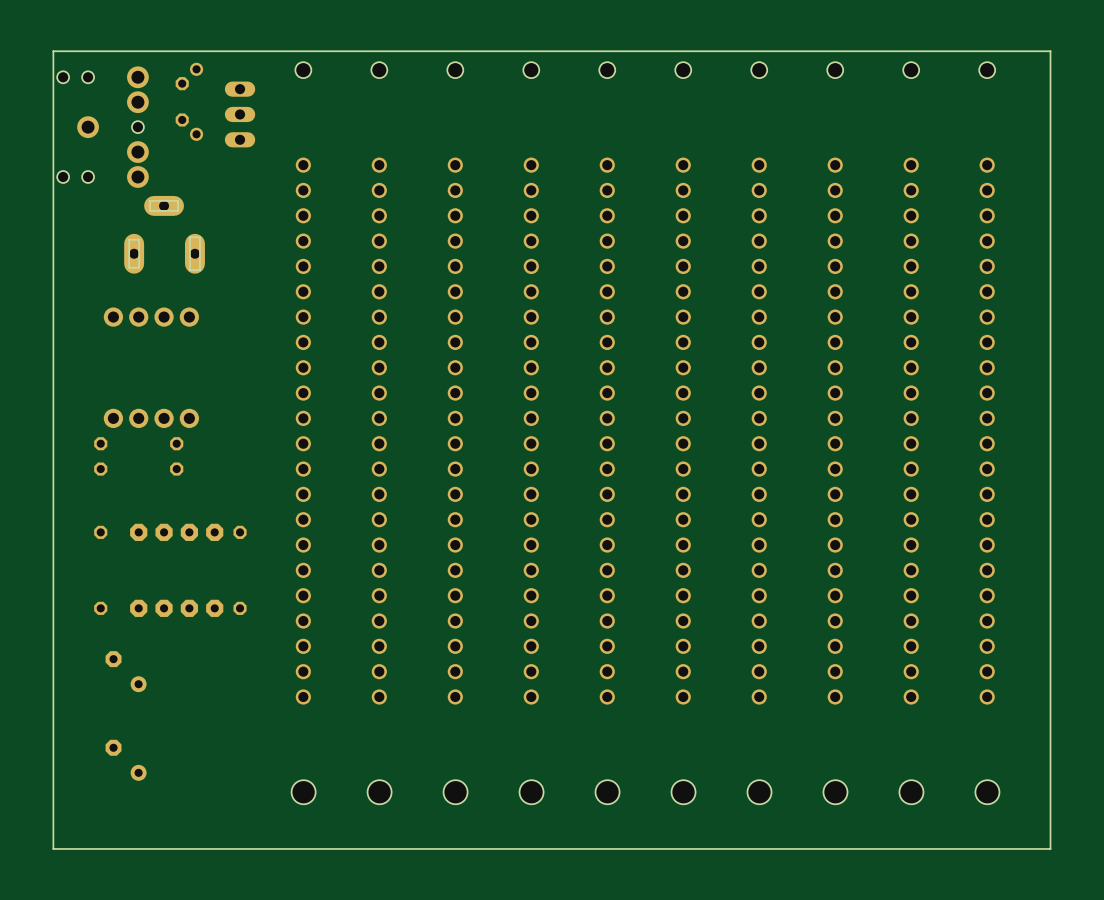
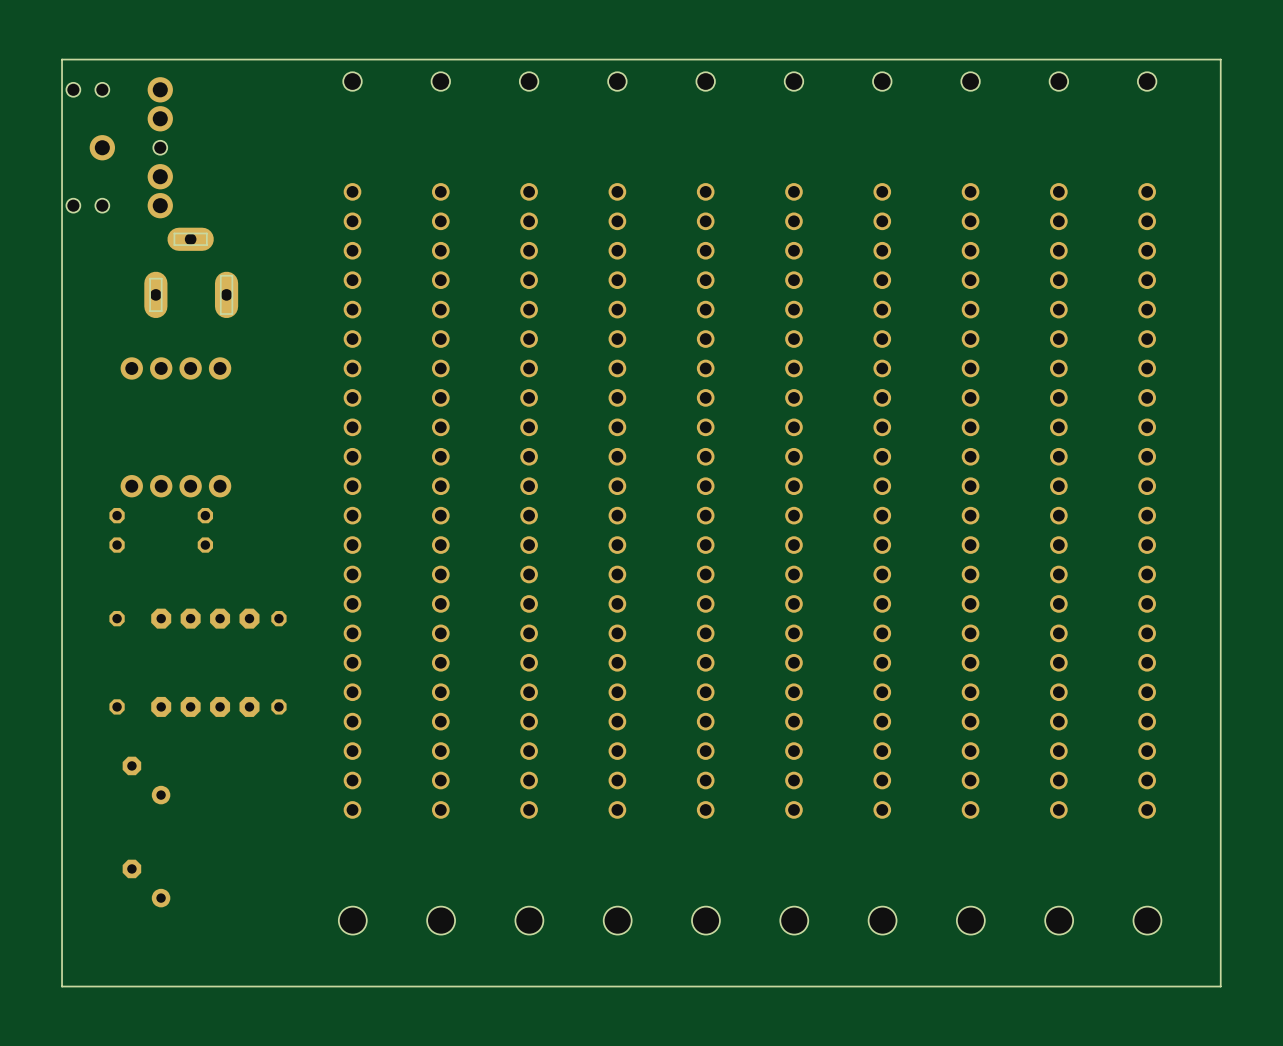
part: (189, 76) -> none
part: (240, 114) -> none
part: (189, 127) -> none

